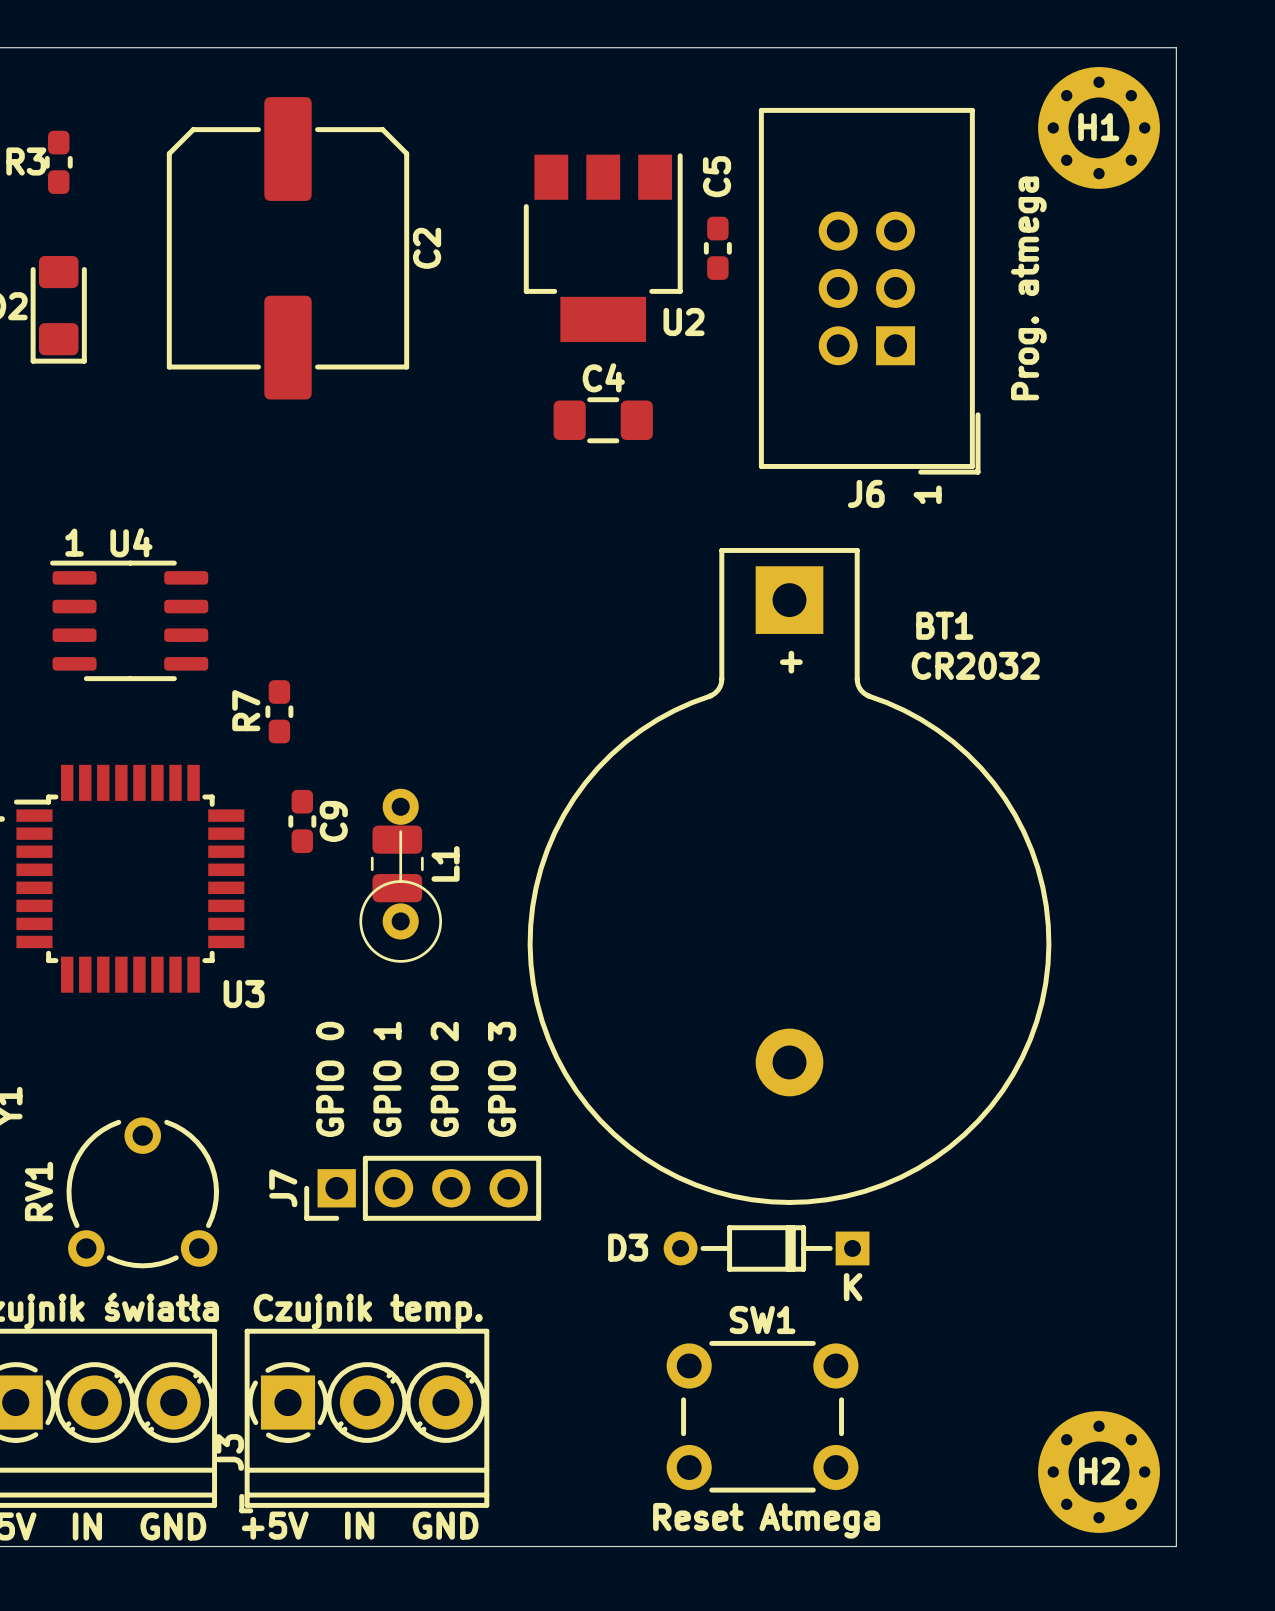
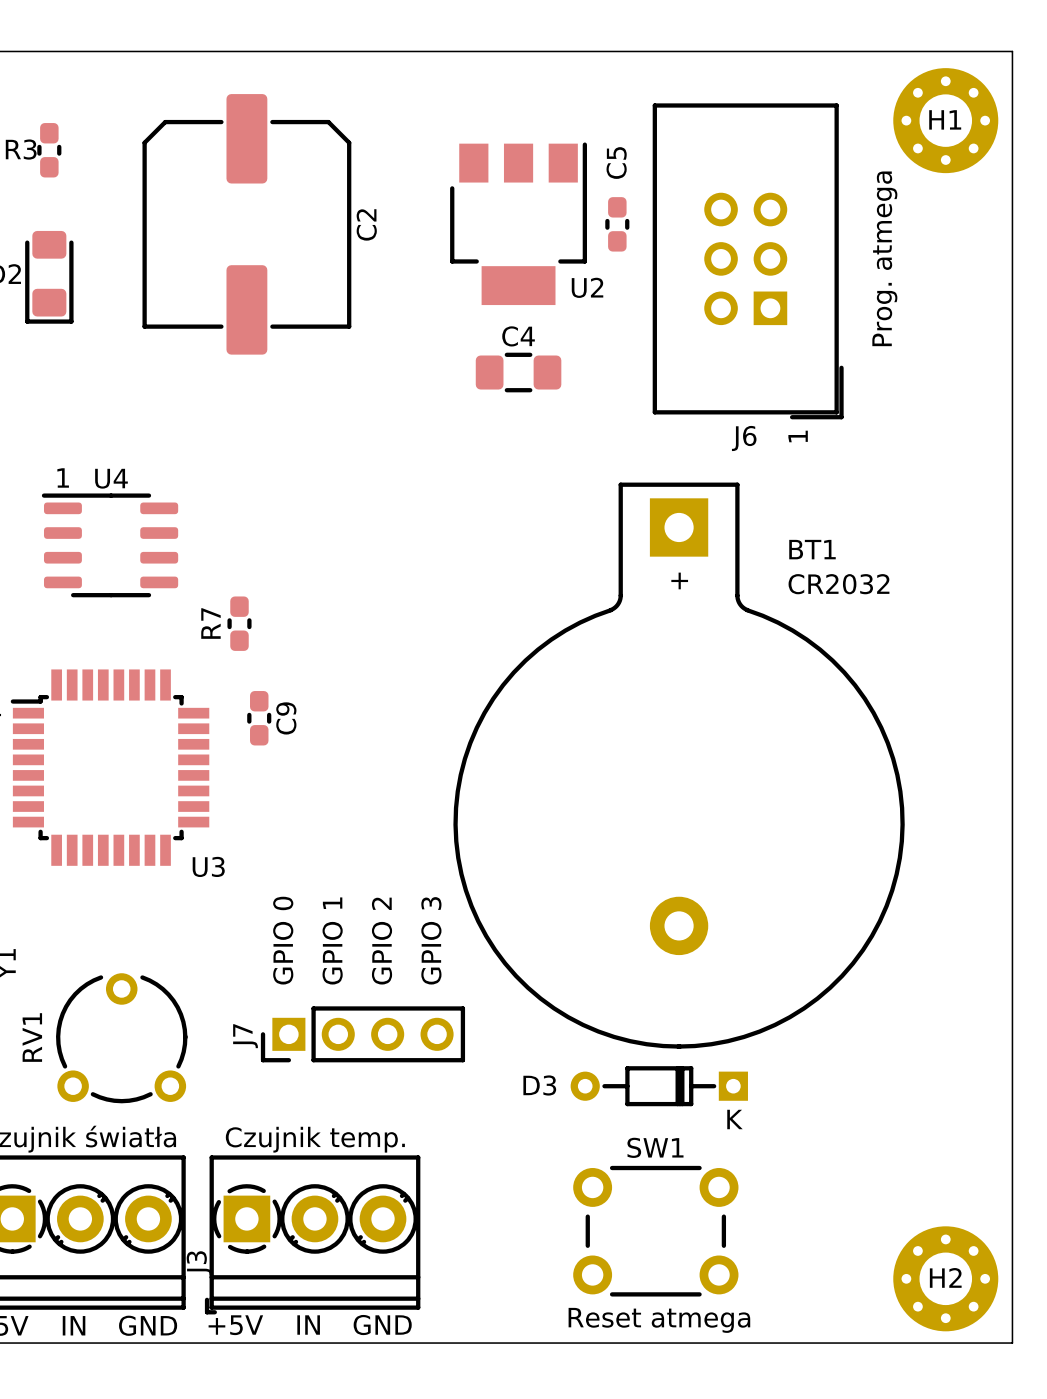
L1: (397, 863) -> none
part: (400, 875) -> none
text: Reset Atmega (766, 1520) -> Reset atmega (659, 1320)

